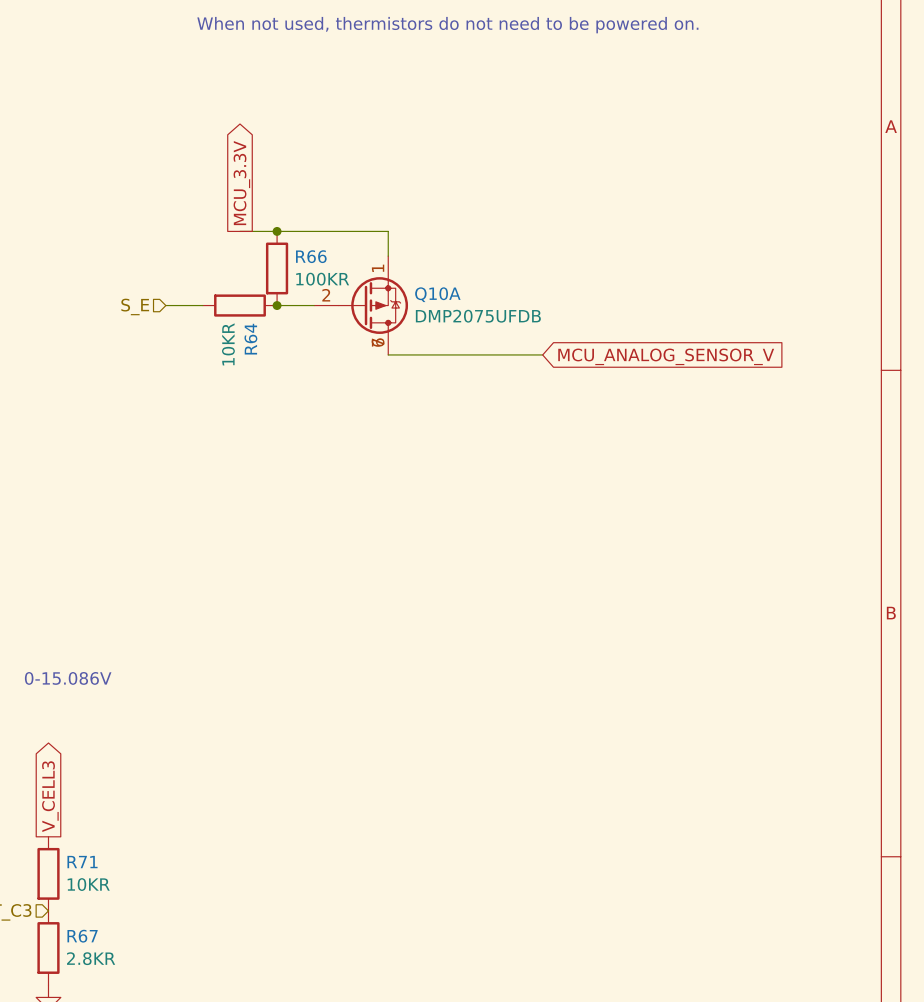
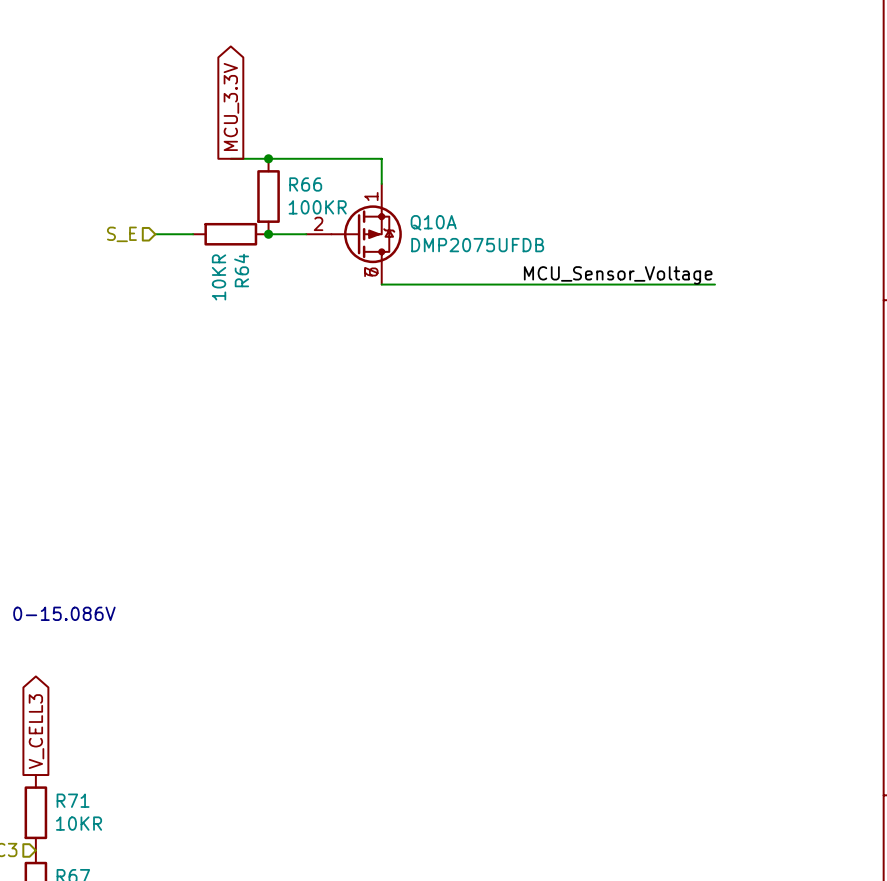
label: none -> MCU_Sensor_Voltage (618, 275)
wire: none -> (538, 284) (715, 284)
global label: MCU_ANALOG_SENSOR_V (666, 356) -> none

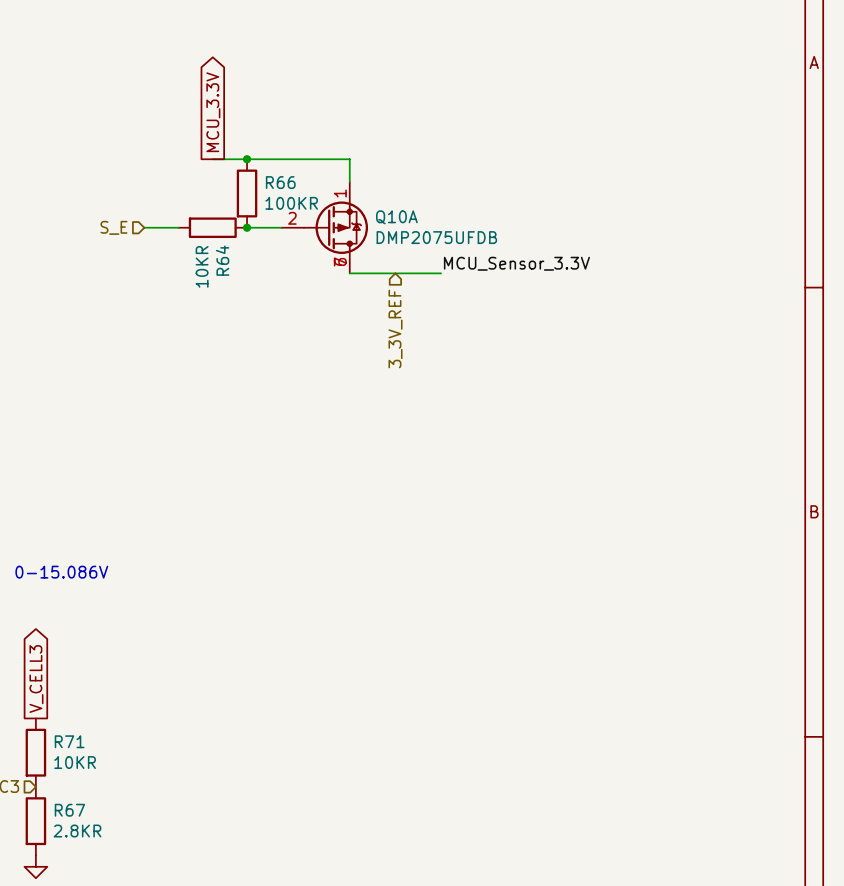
label: MCU_Sensor_Voltage (618, 275) -> MCU_Sensor_3.3V (516, 263)
wire: (482, 284) (715, 284) -> none
hierarchical label: none -> 3_3V_REF (395, 328)

